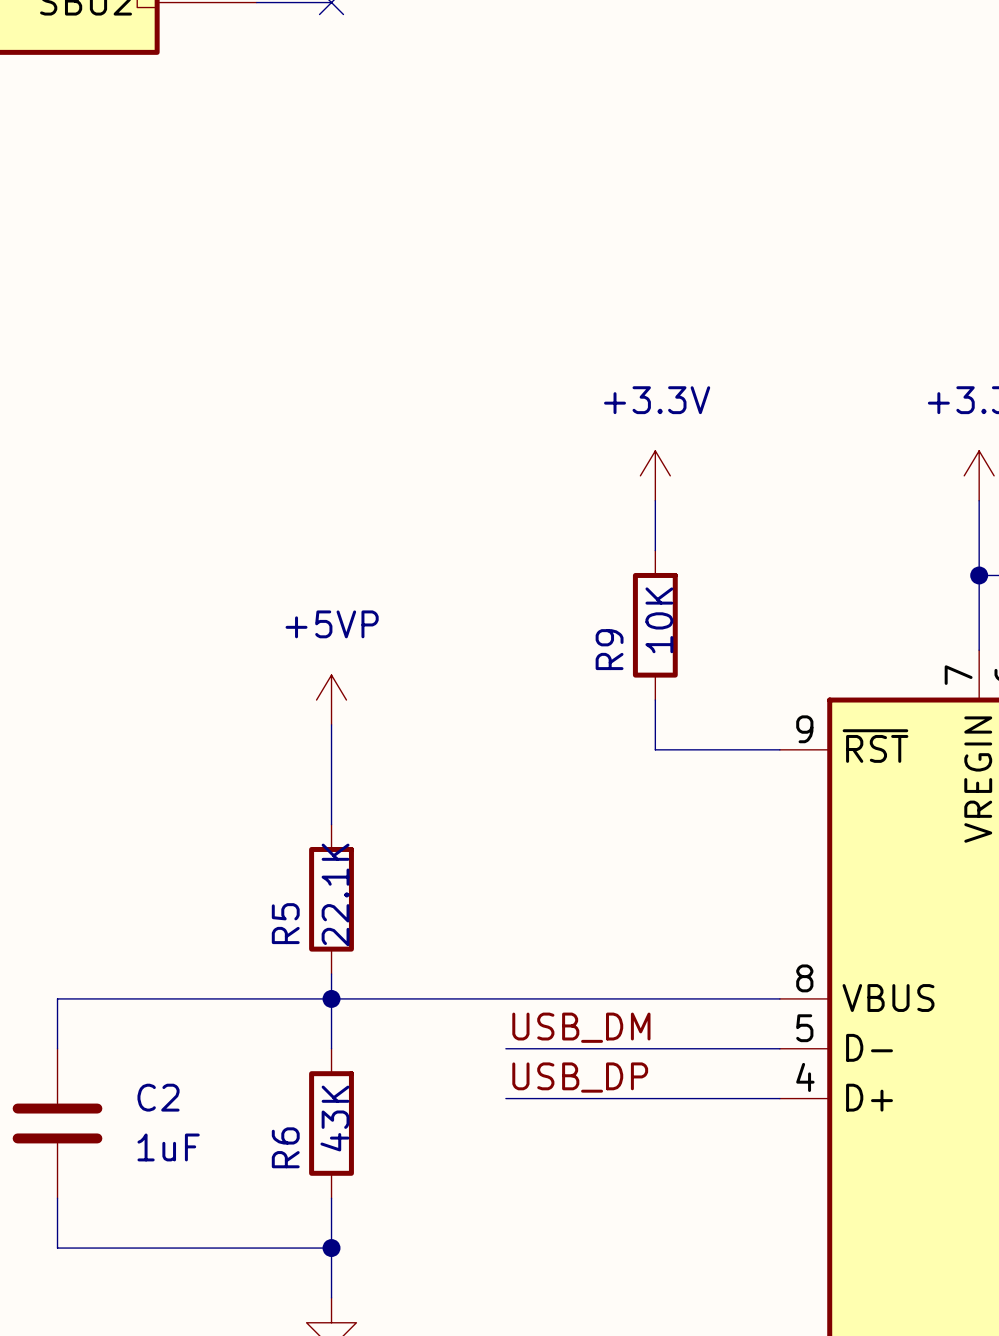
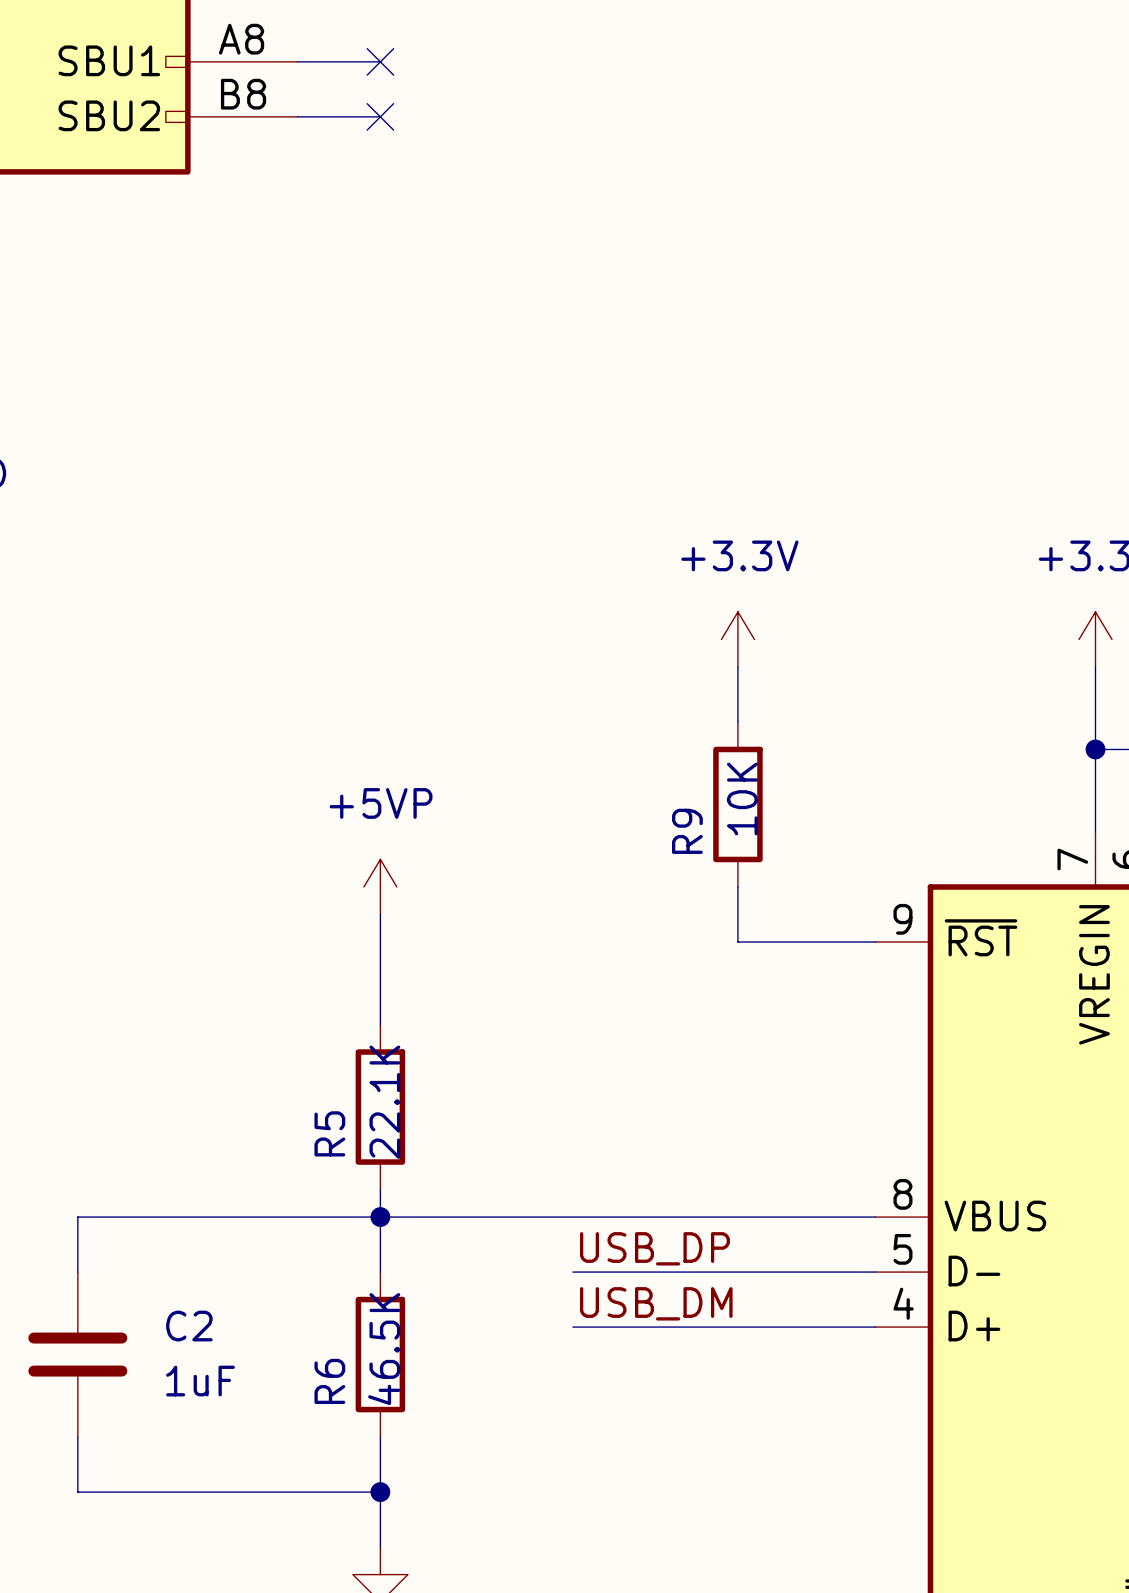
label: USB_DM (581, 1027) -> USB_DP (654, 1248)
label: USB_DP (580, 1077) -> USB_DM (656, 1303)
R6 value: 43K (334, 1118) -> 46.5K (384, 1349)

